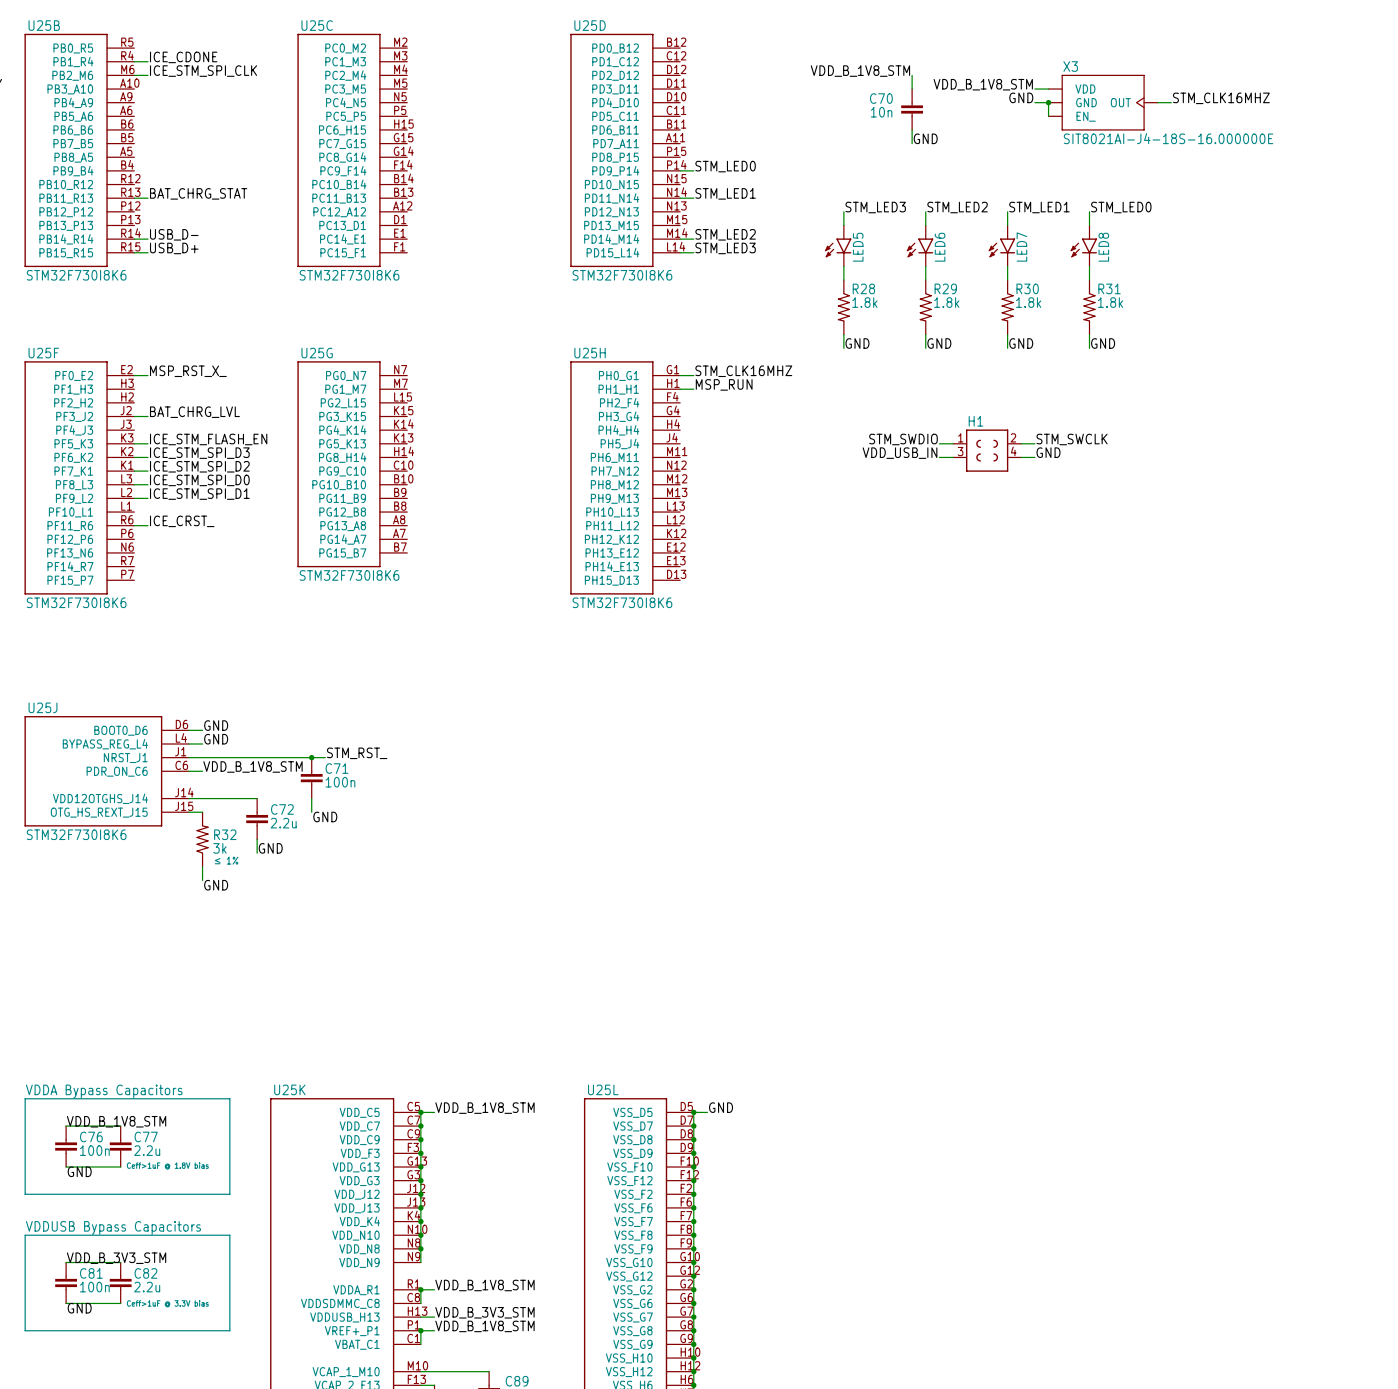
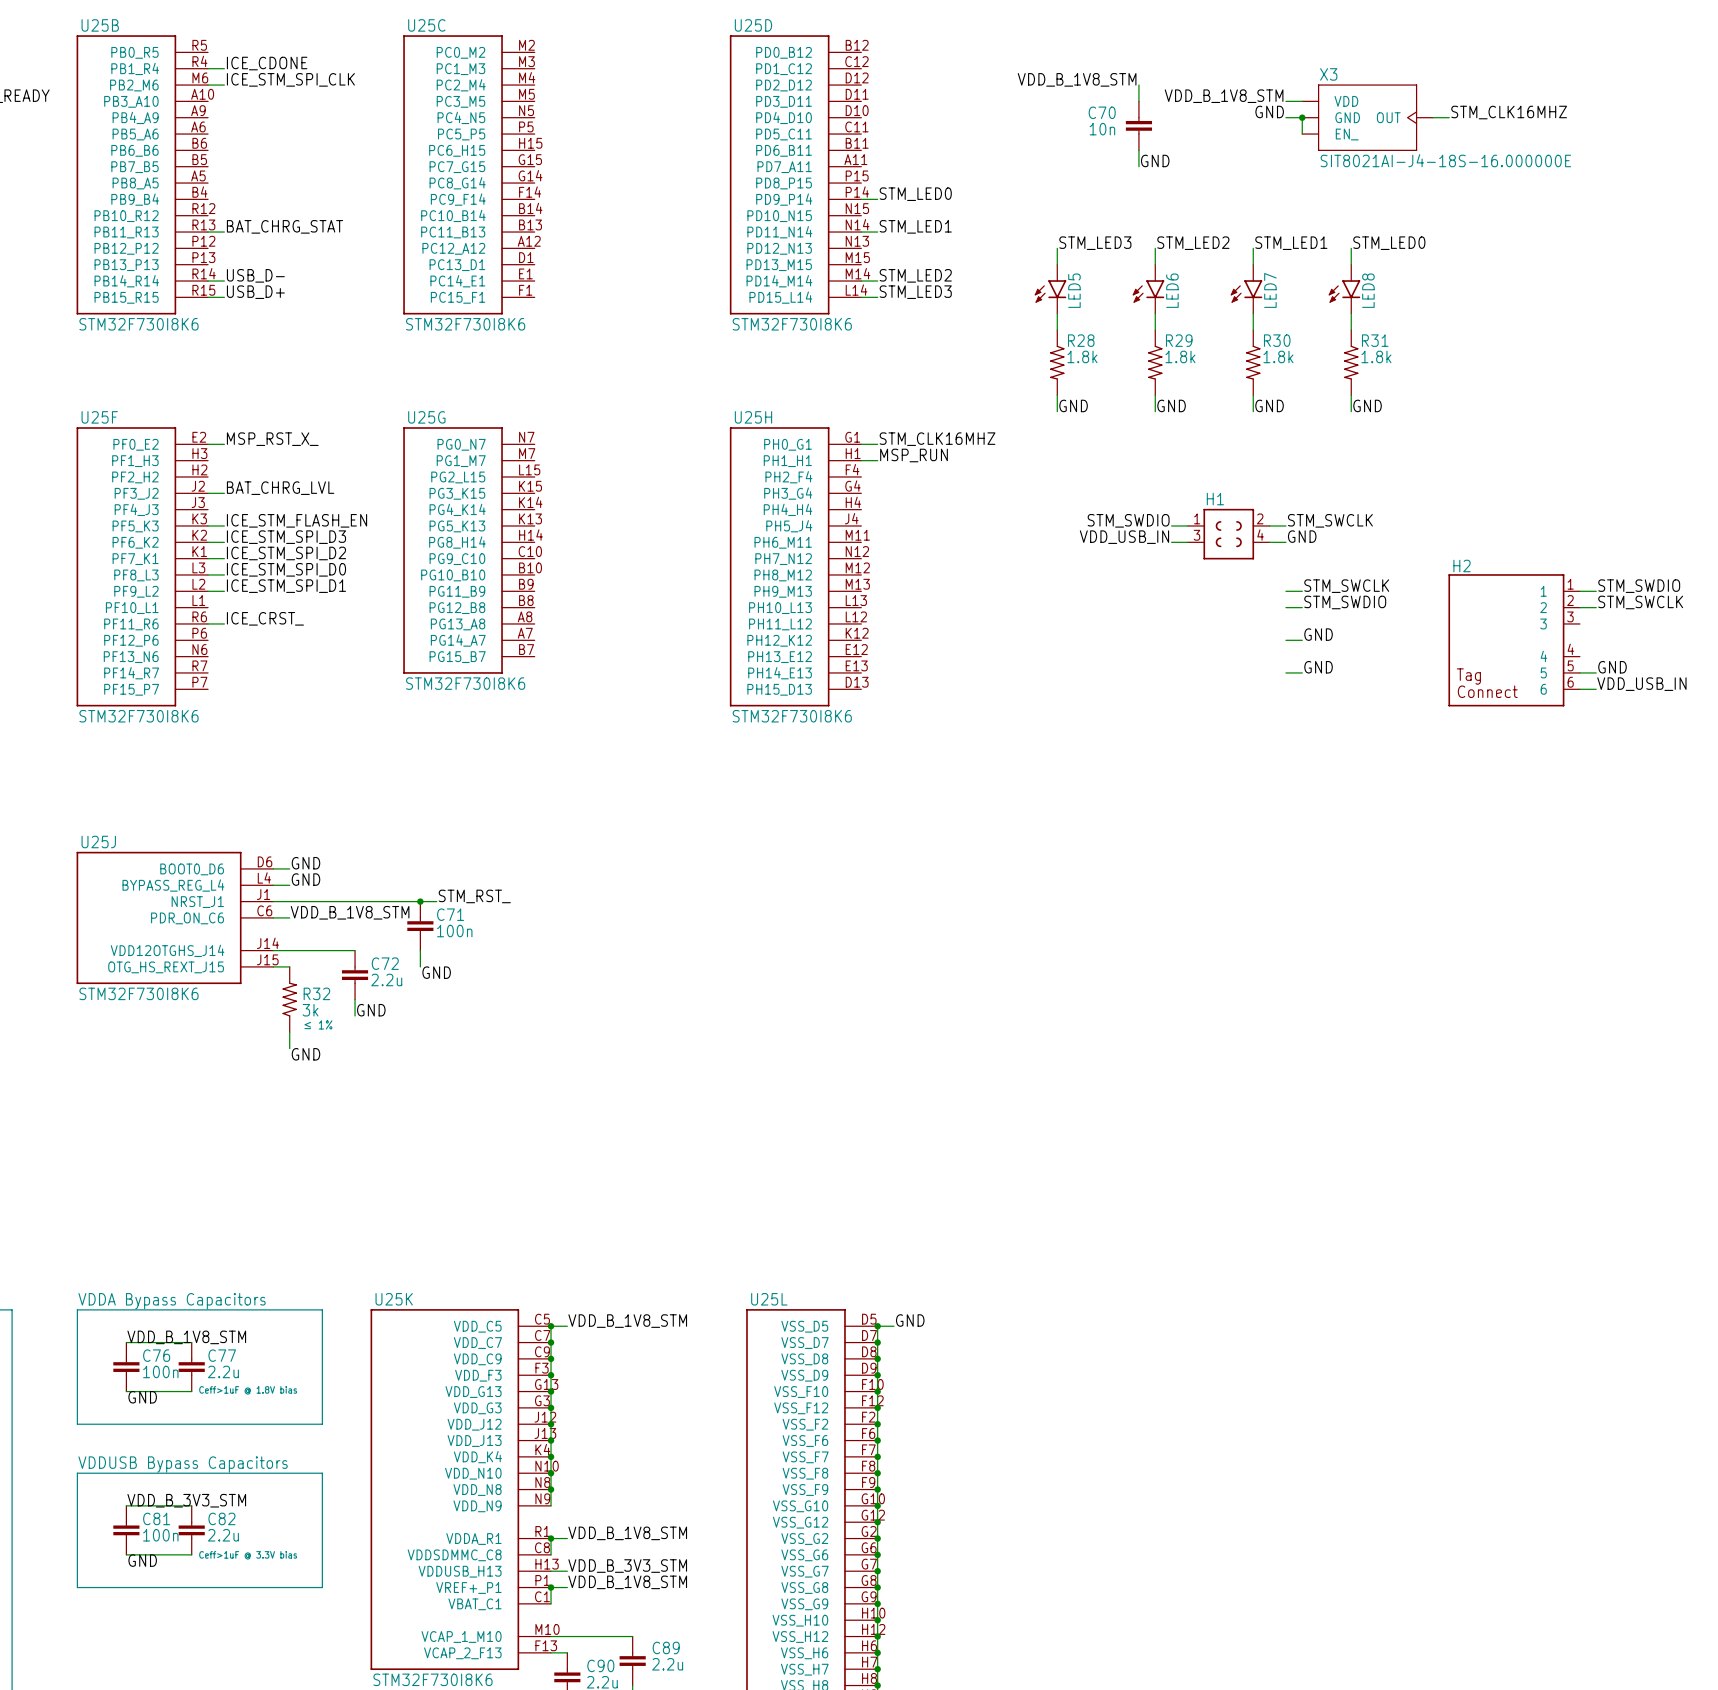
label: none -> STM_SWCLK (1346, 586)
label: none -> STM_SWDIO (1639, 586)
wire: none -> (1285, 591) (1302, 591)
wire: none -> (1579, 591) (1596, 591)
label: none -> STM_SWDIO (1345, 602)
label: none -> STM_SWCLK (1640, 602)
wire: none -> (1285, 607) (1302, 607)
wire: none -> (1579, 607) (1596, 607)
label: none -> GND (1318, 634)
wire: none -> (1285, 640) (1302, 640)
H2: none -> (1514, 640)
label: none -> GND (1318, 667)
label: none -> GND (1612, 667)
wire: none -> (1285, 672) (1302, 672)
wire: none -> (1579, 672) (1596, 672)
label: none -> VDD_USB_IN (1641, 684)
wire: none -> (1579, 689) (1596, 689)

